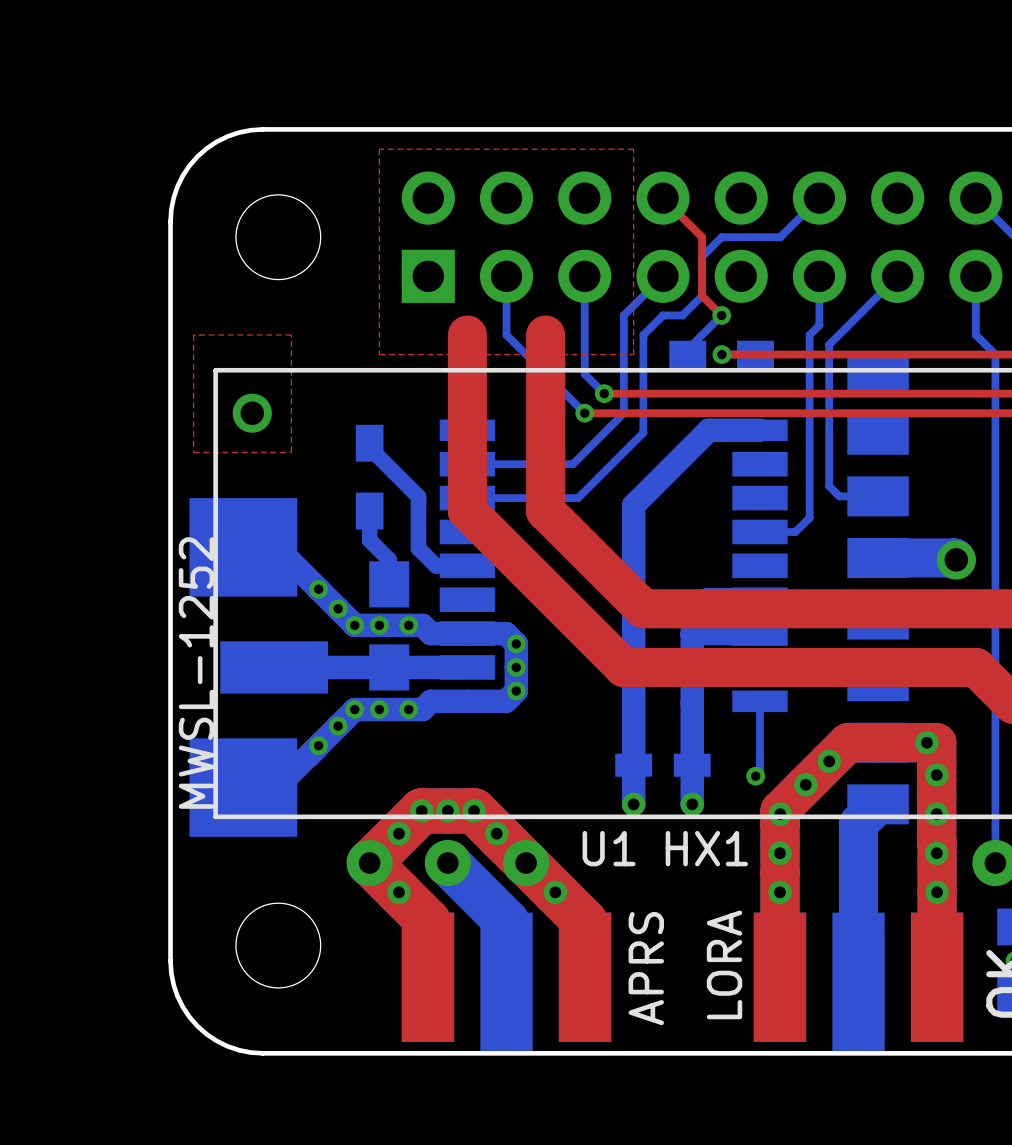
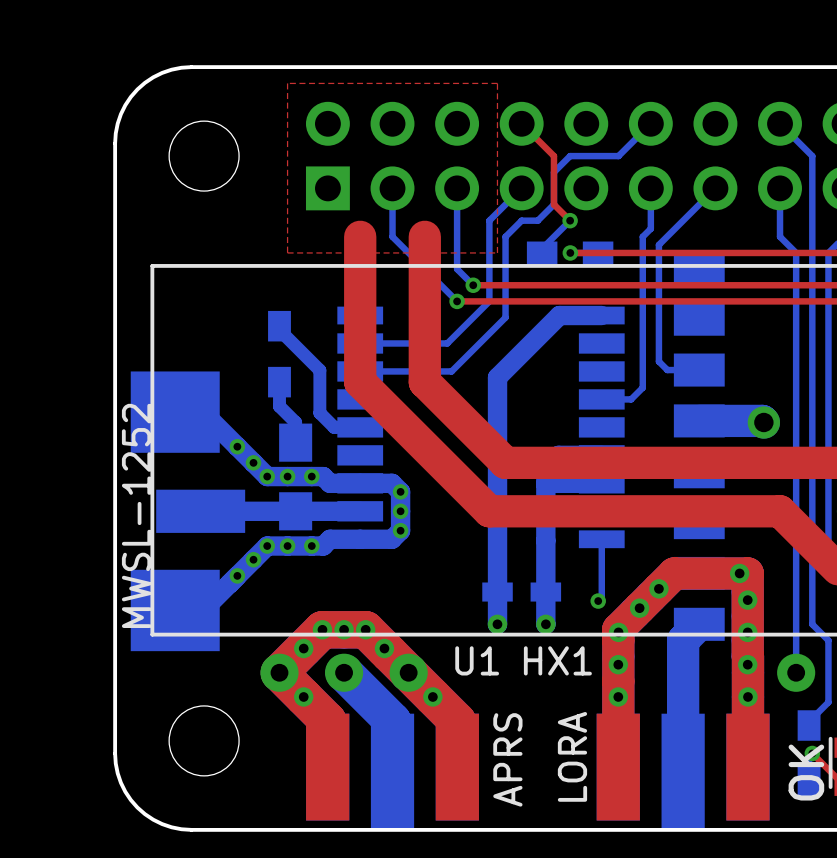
top zone outline: (193, 335) (193, 452) (291, 452) (291, 335) (193, 335) -> none
via: (252, 413) -> none

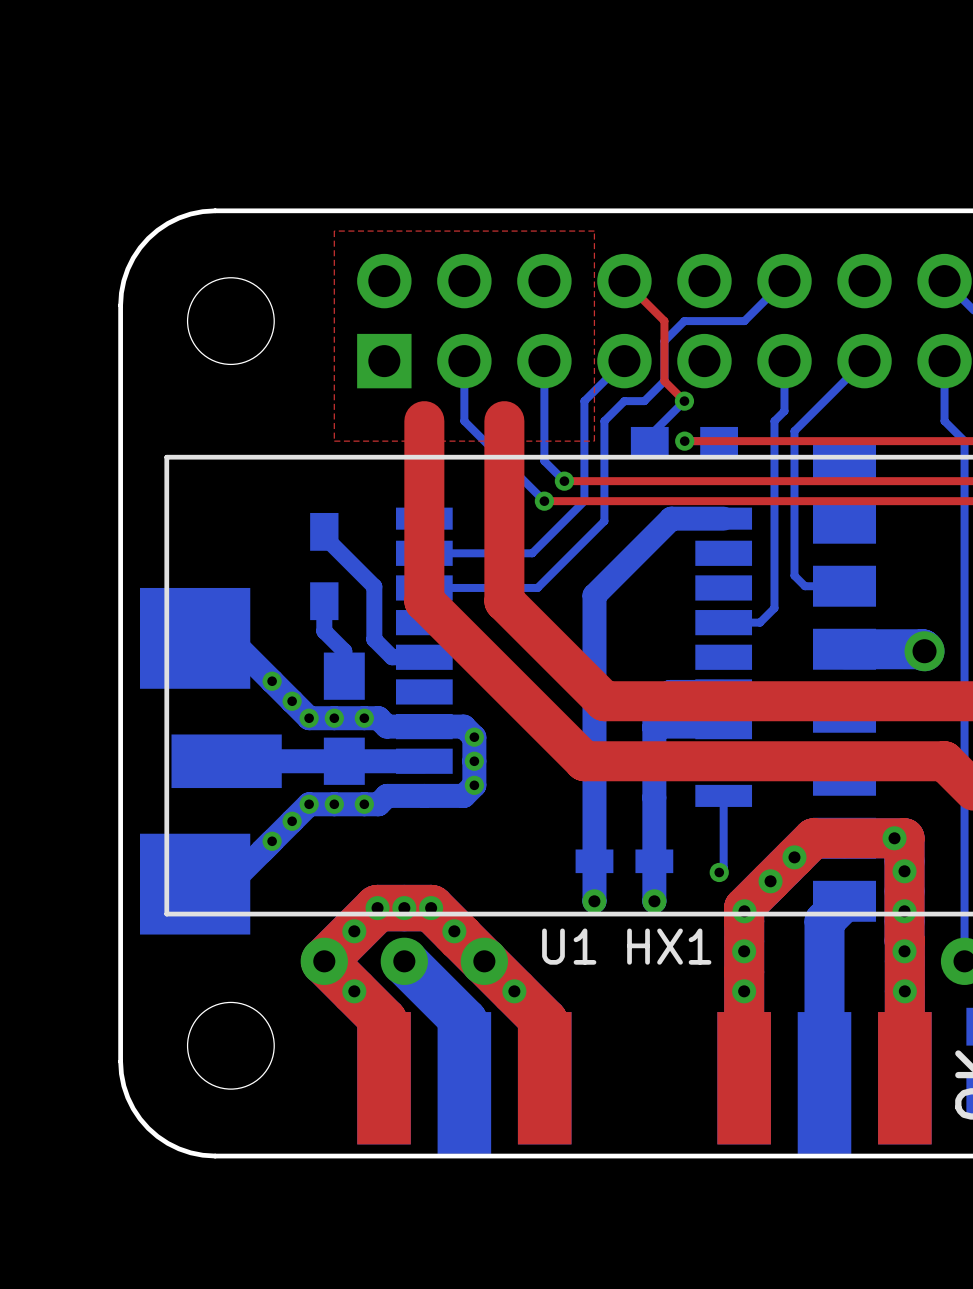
part value: MWSL-1252 (136, 515) -> none
part value: LORA (572, 756) -> none
part value: APRS (507, 759) -> none

